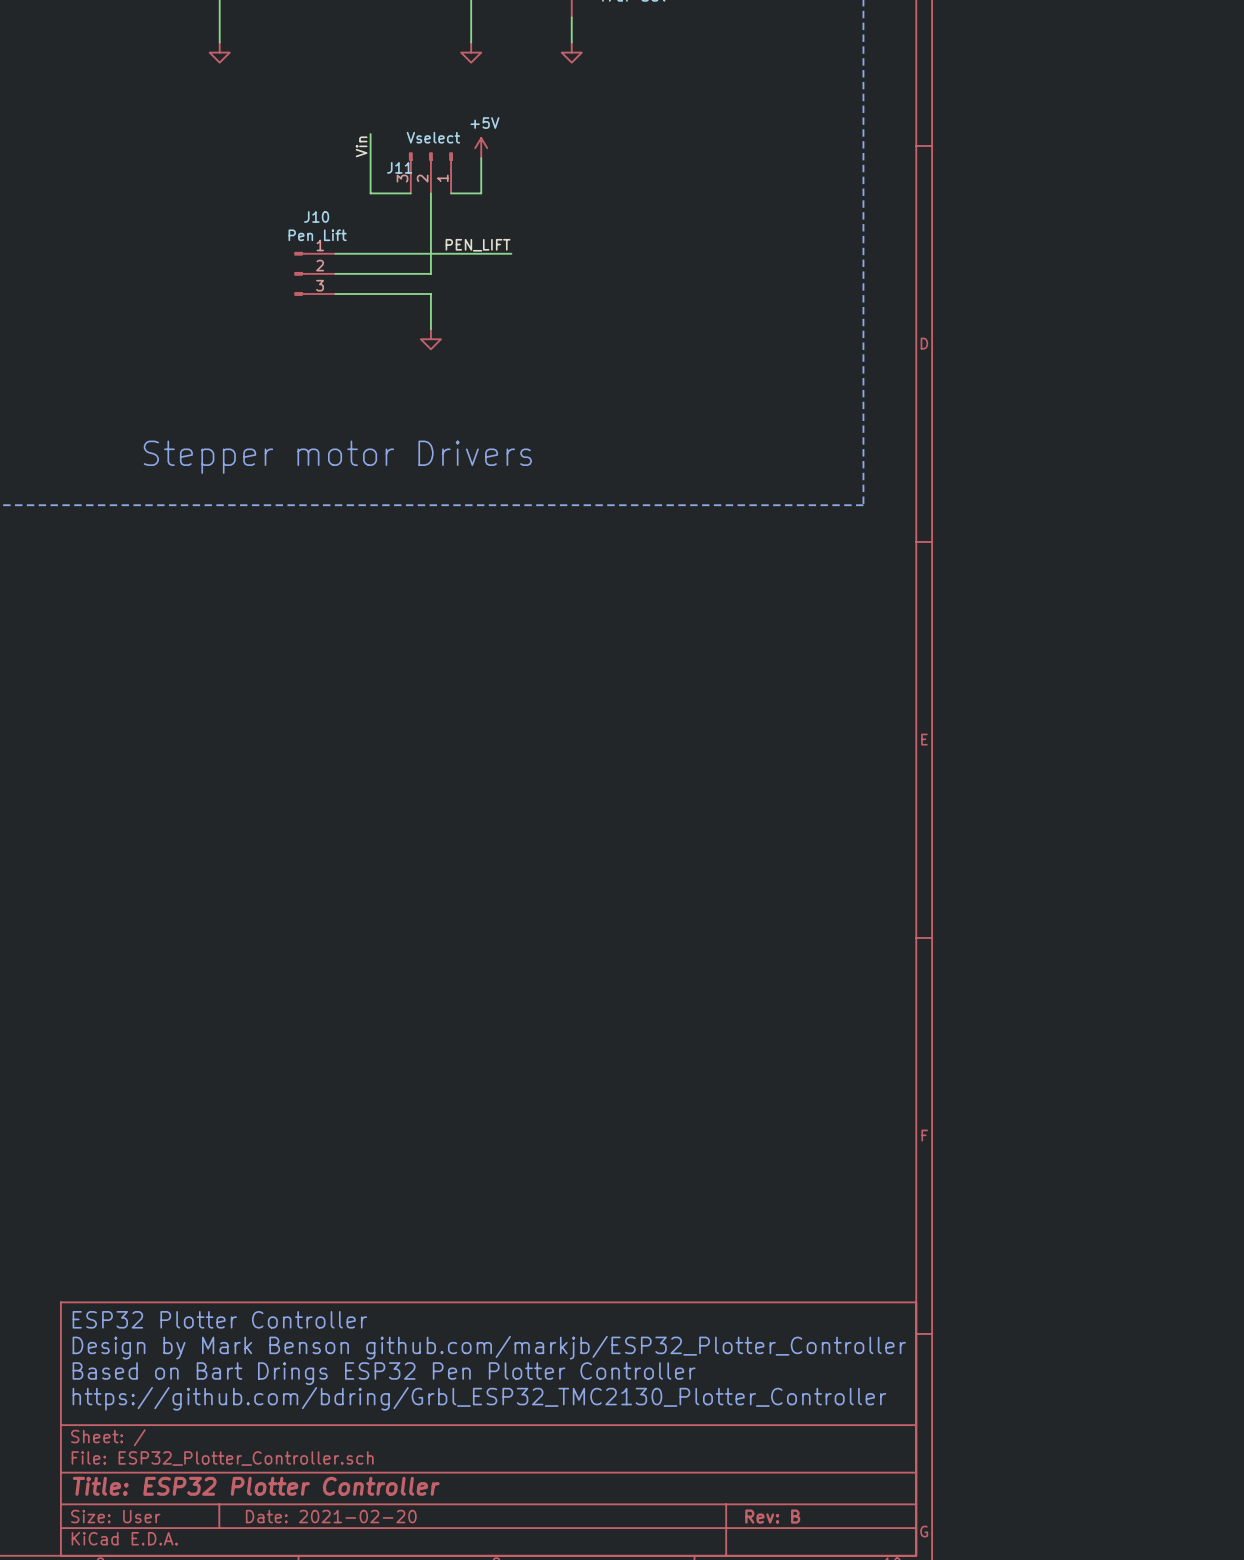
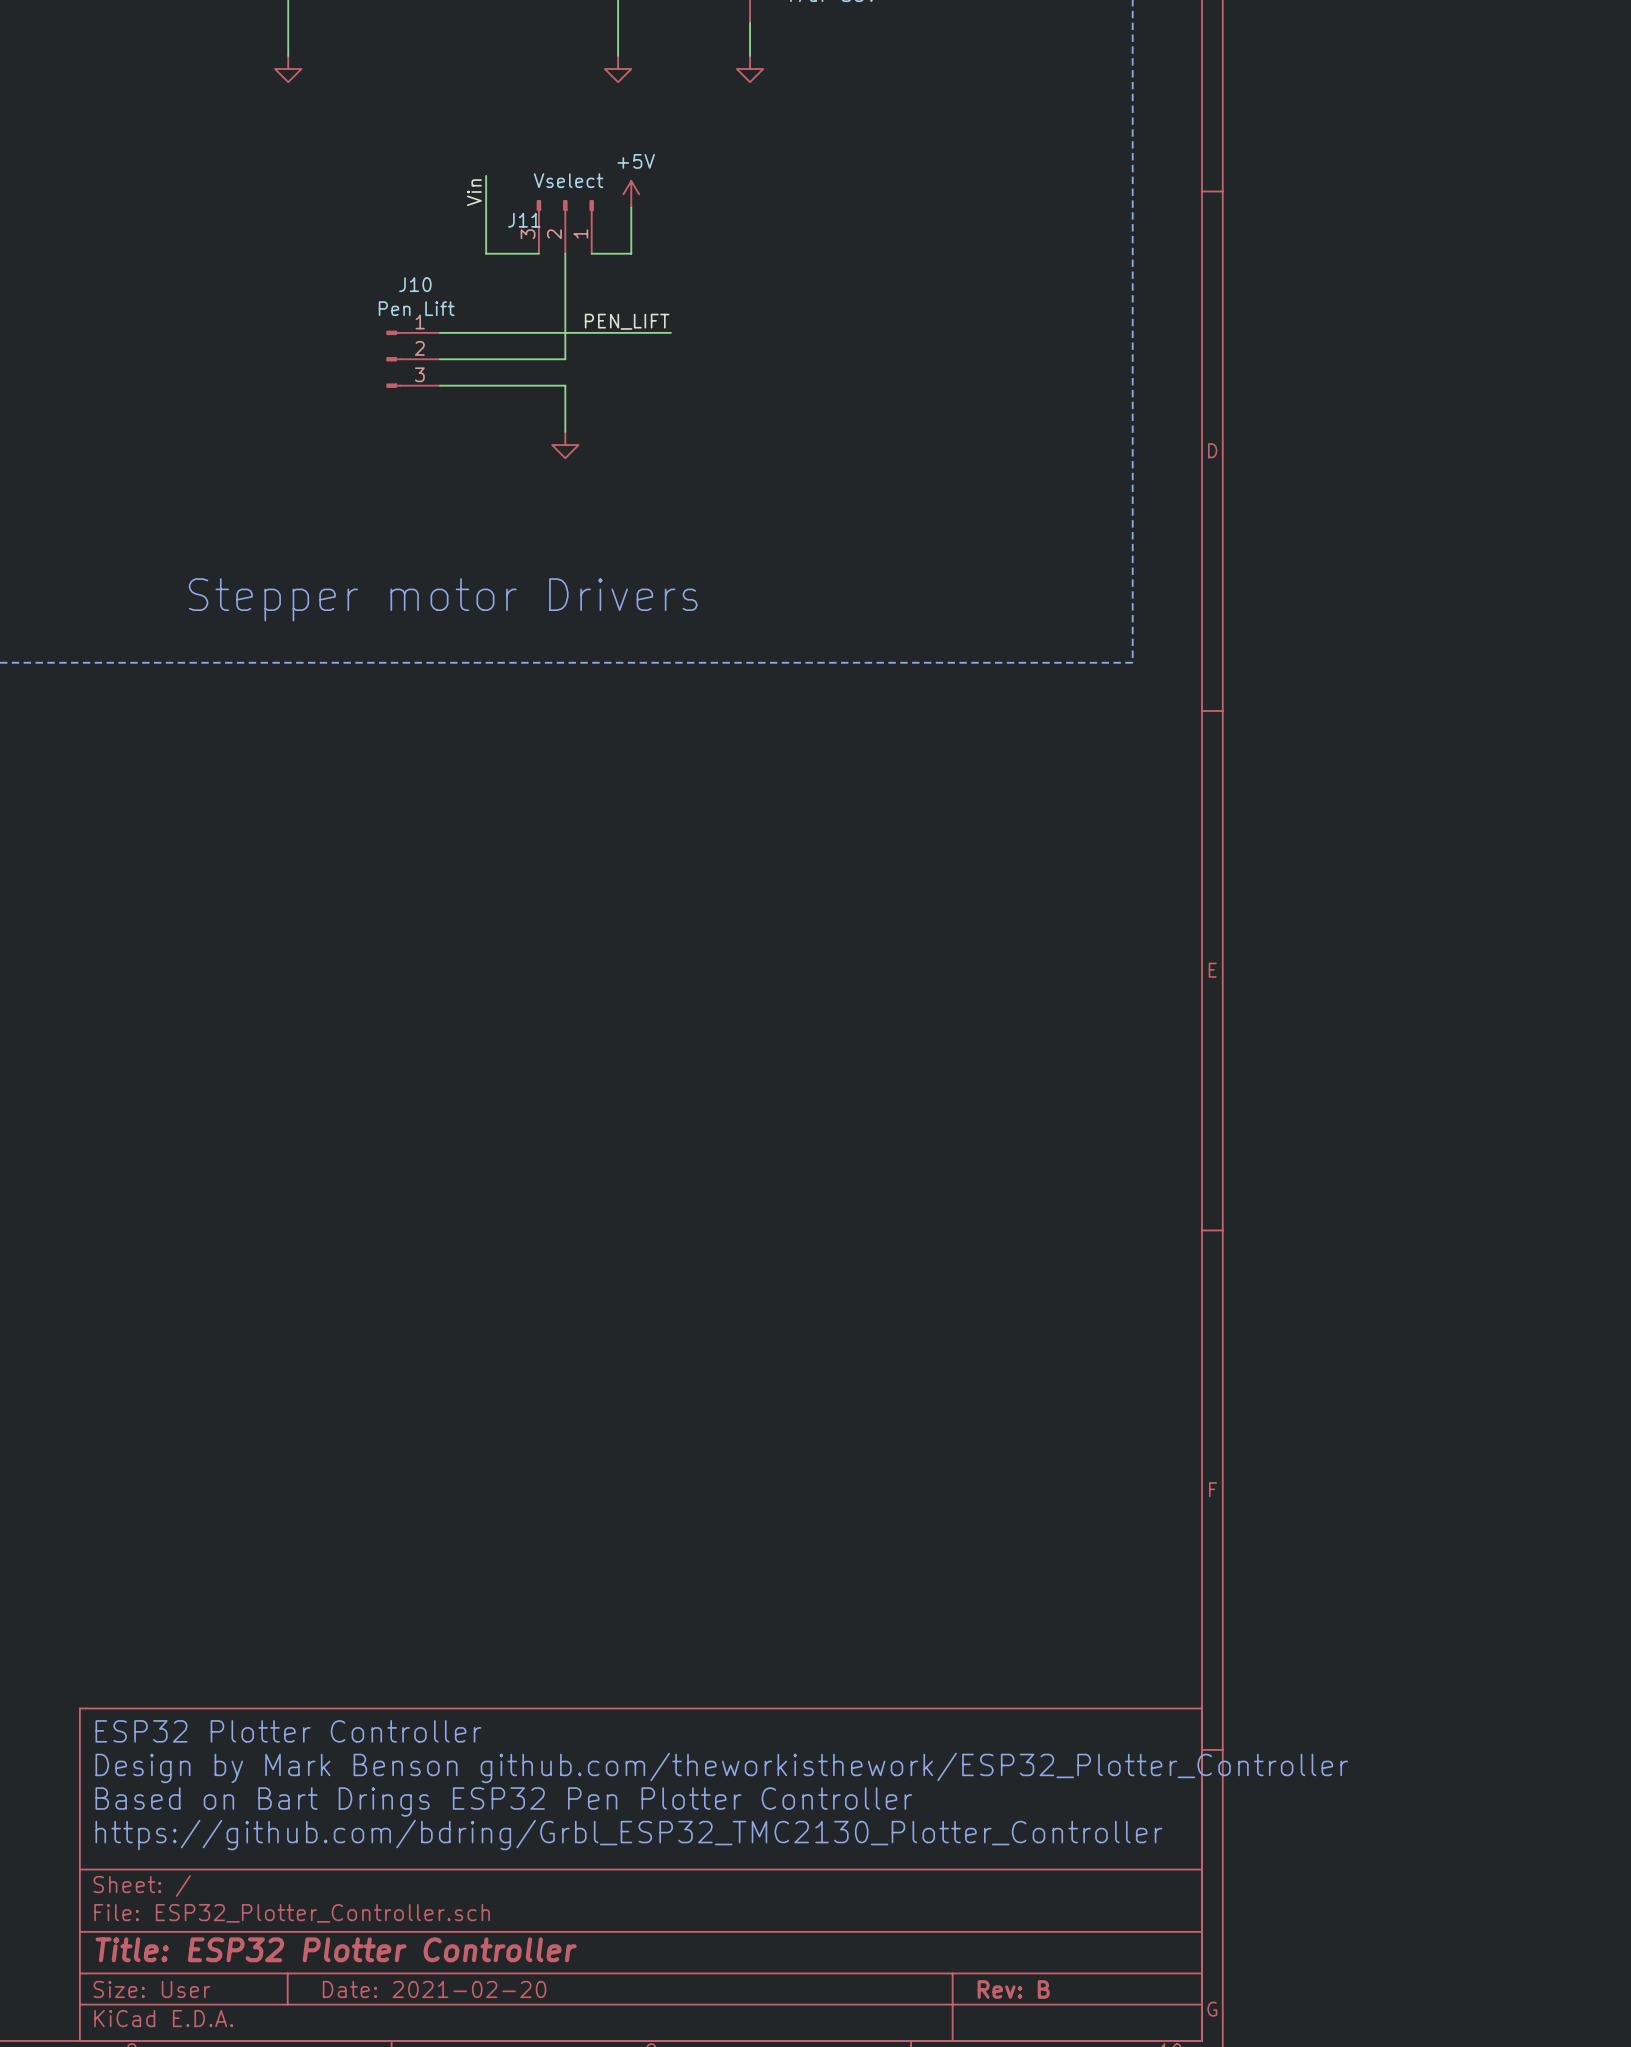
text: Design by Mark Benson github.com/markjb/ESP32_Plotter_Controller (489, 1347) -> Design by Mark Benson github.com/theworkisthework/ESP32_Plotter_Controller (721, 1767)

